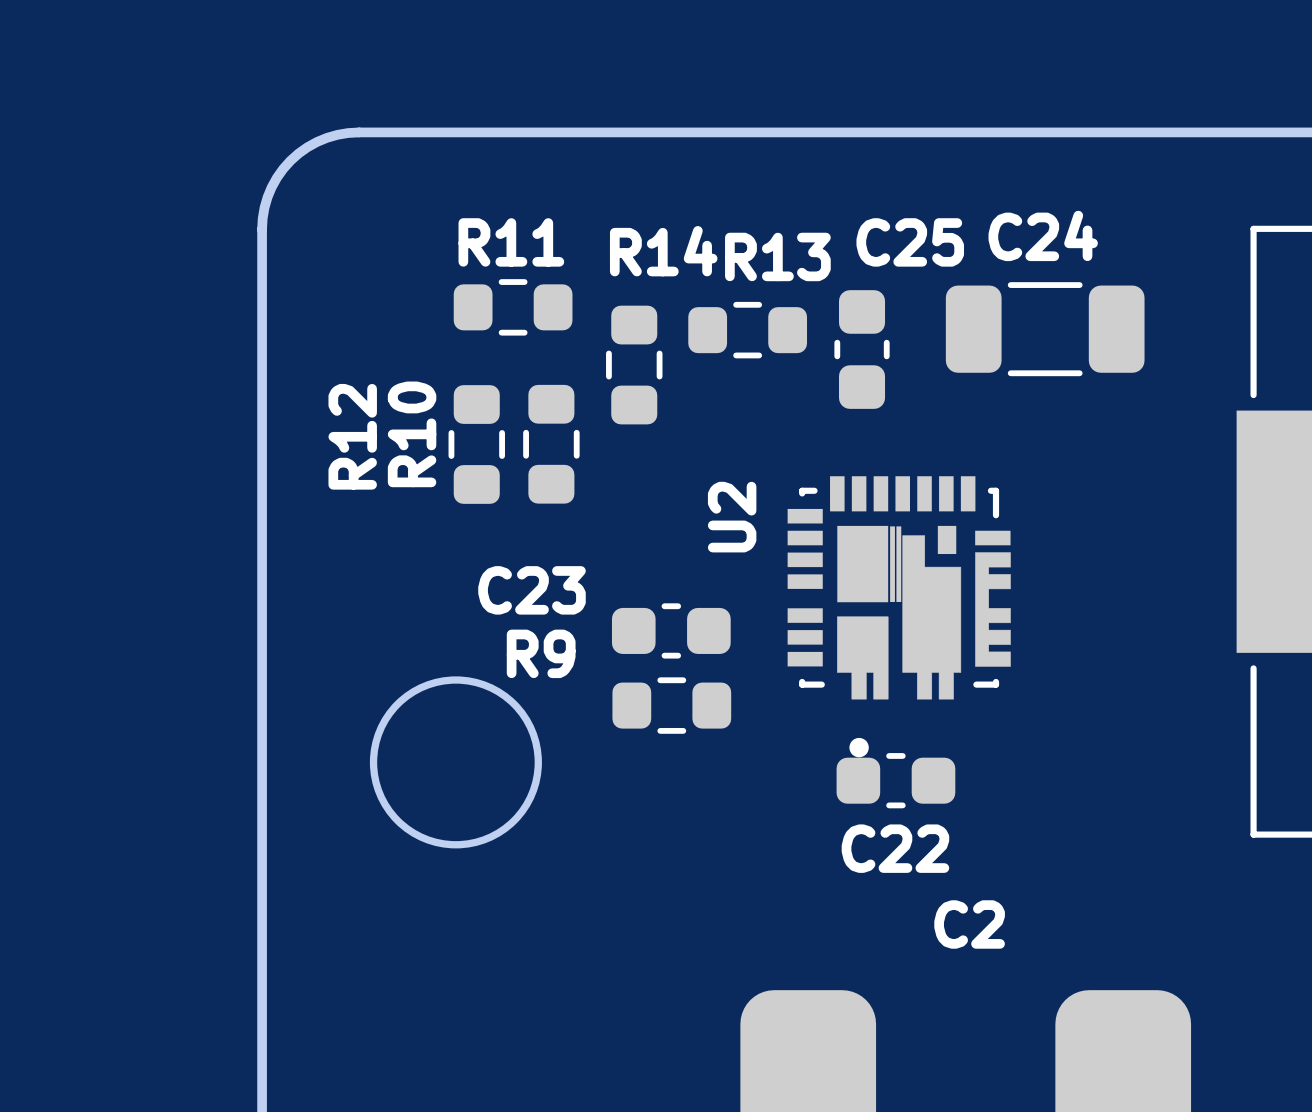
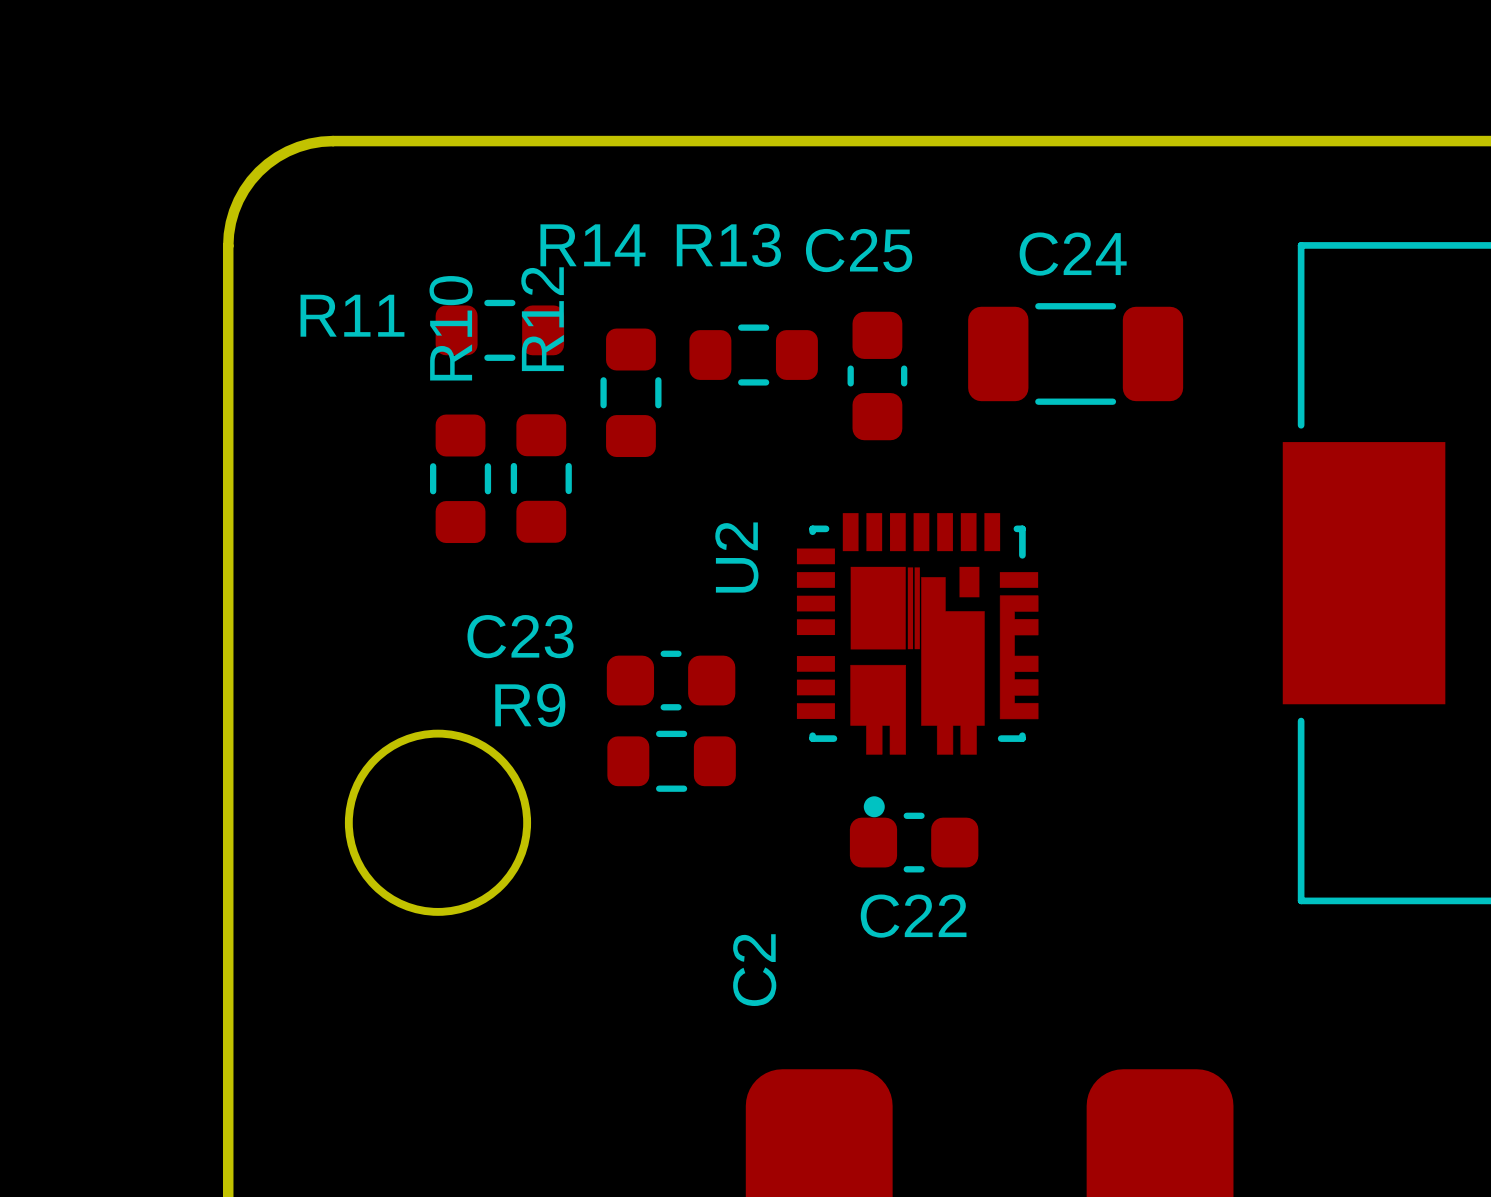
R11 name position: R11 (511, 242) -> R11 (352, 315)
C25 name position: C25 (910, 242) -> C25 (859, 250)
R14 name position: R14 (663, 251) -> R14 (592, 245)
R13 name position: R13 (777, 256) -> R13 (728, 245)
R10 name position: R10 (412, 434) -> R10 (451, 328)
R12 name position: R12 (352, 436) -> R12 (542, 319)
C2 name rotation: 0° (969, 924) -> 90° counterclockwise (754, 970)
C2 name position: C2 (969, 924) -> C2 (754, 970)

